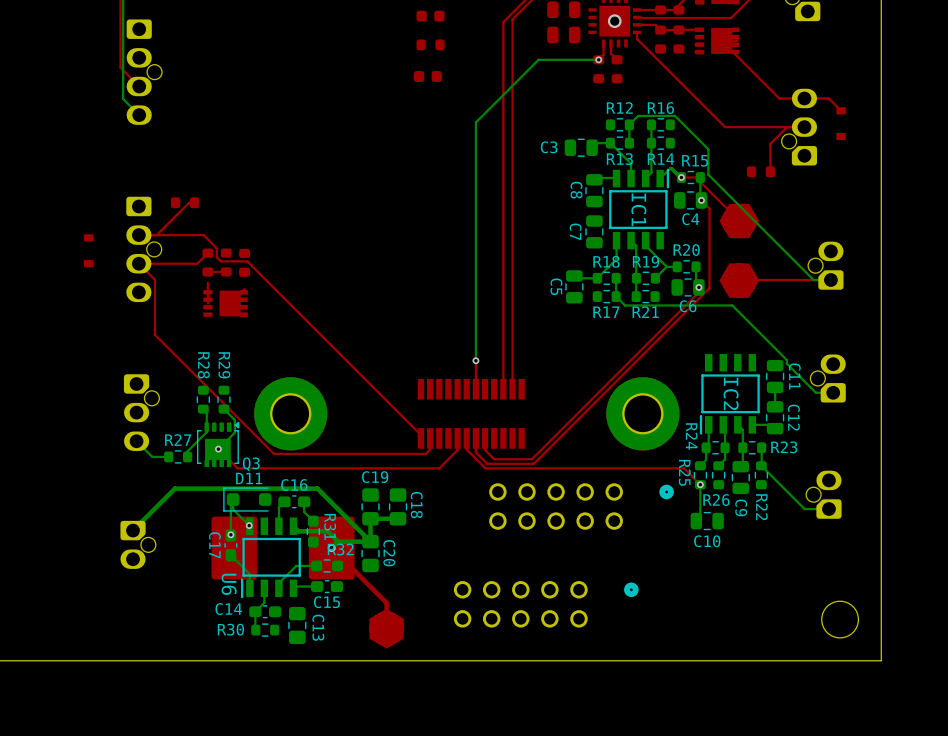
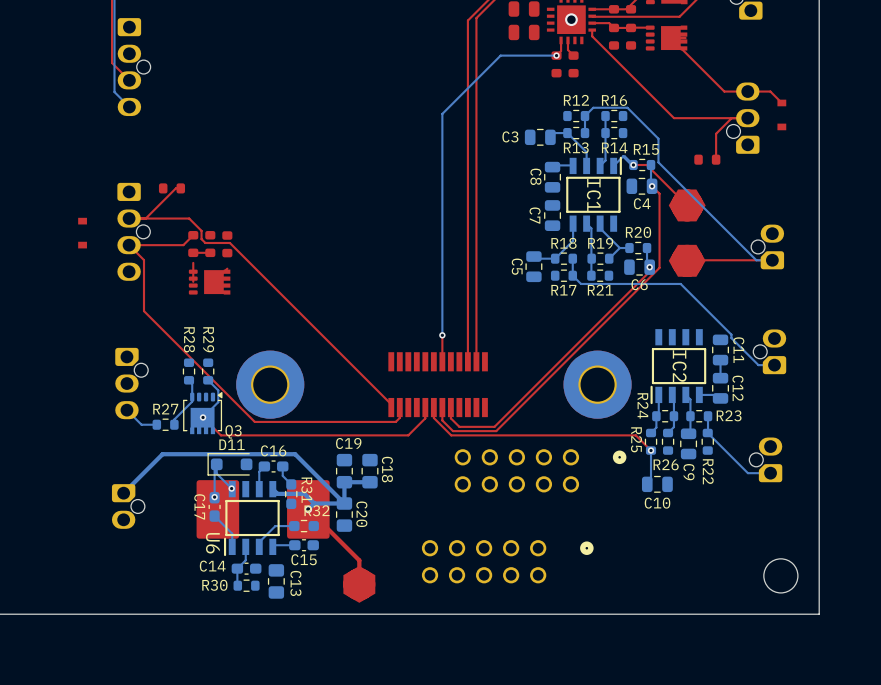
part: (430, 16) -> none
part: (430, 44) -> none
part: (427, 76) -> none

